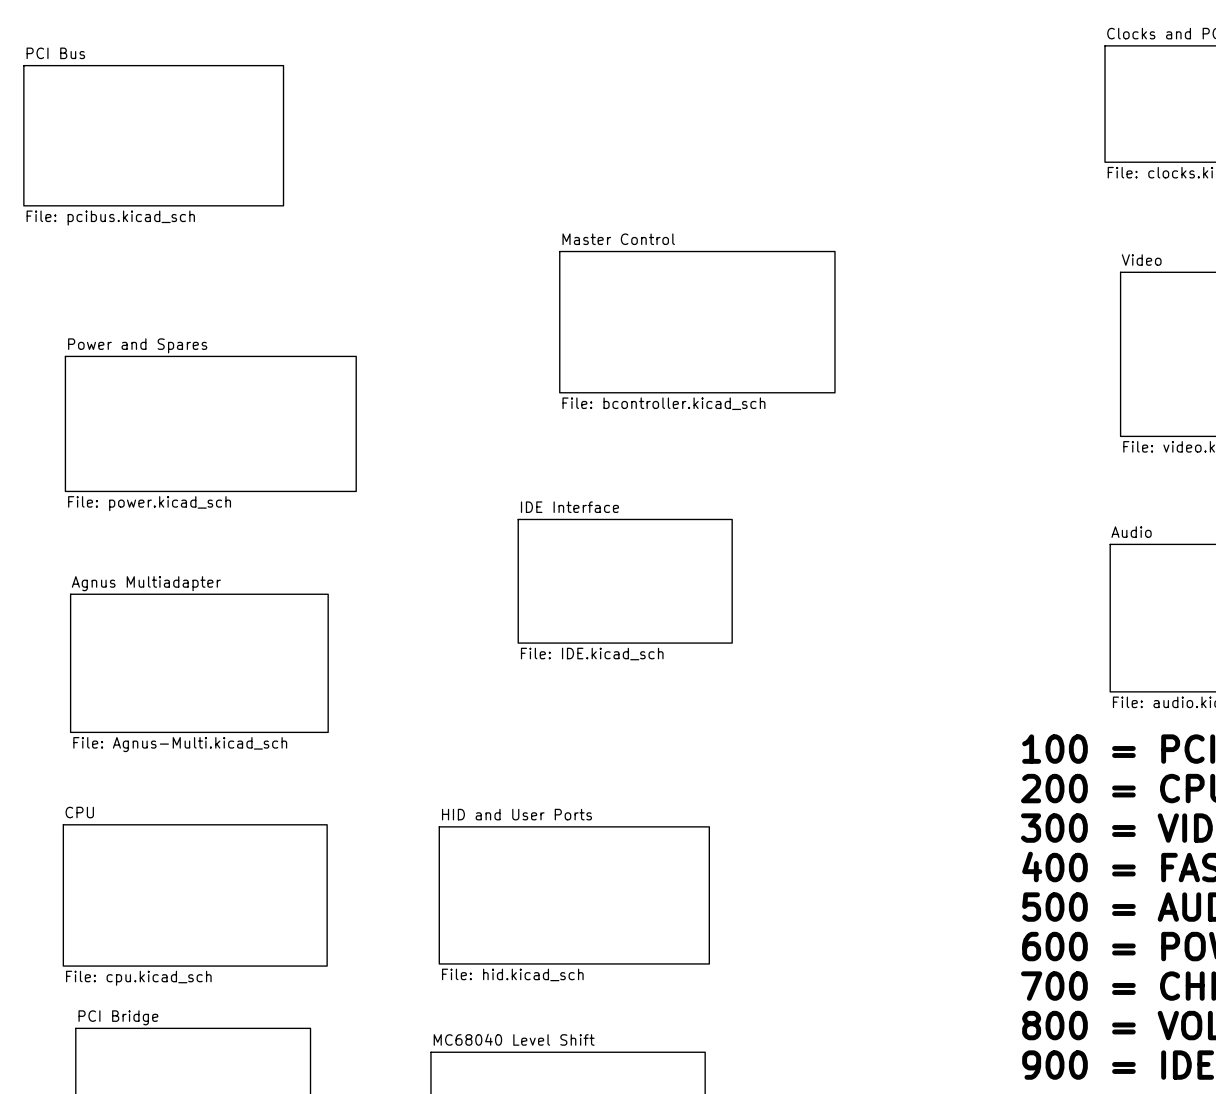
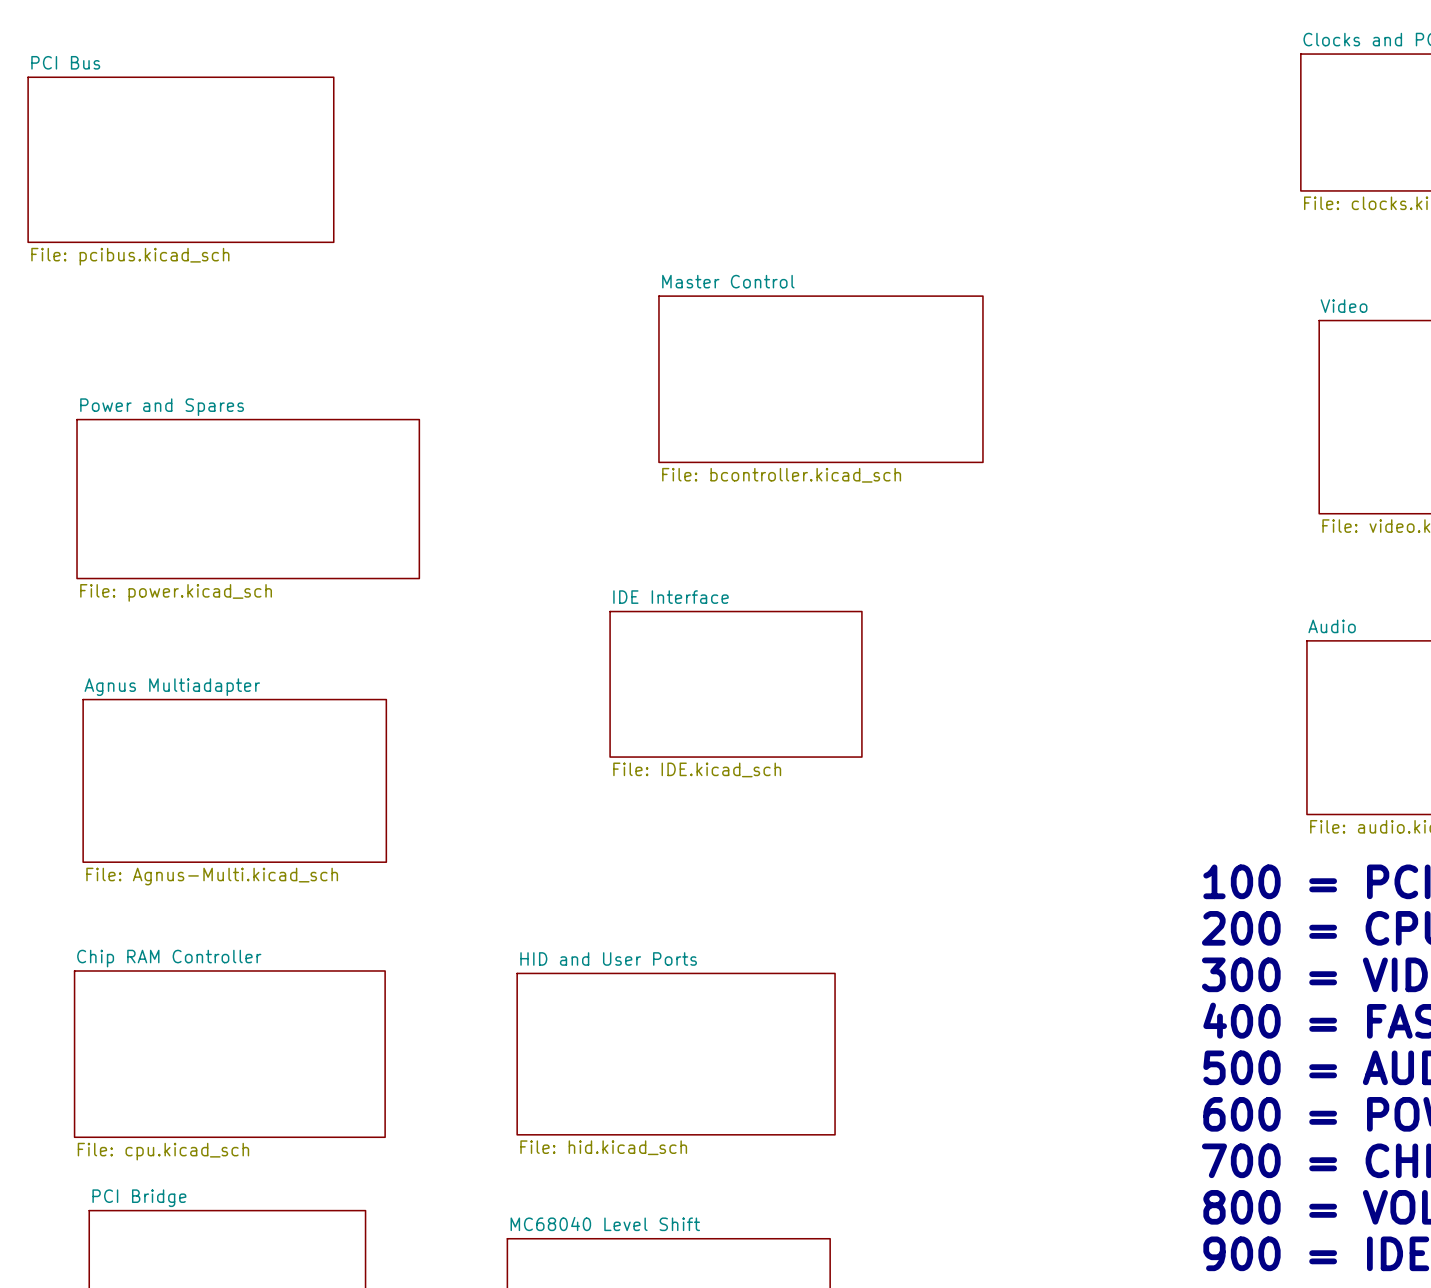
sheet CPU name: CPU (79, 812) -> Chip RAM Controller (169, 958)

